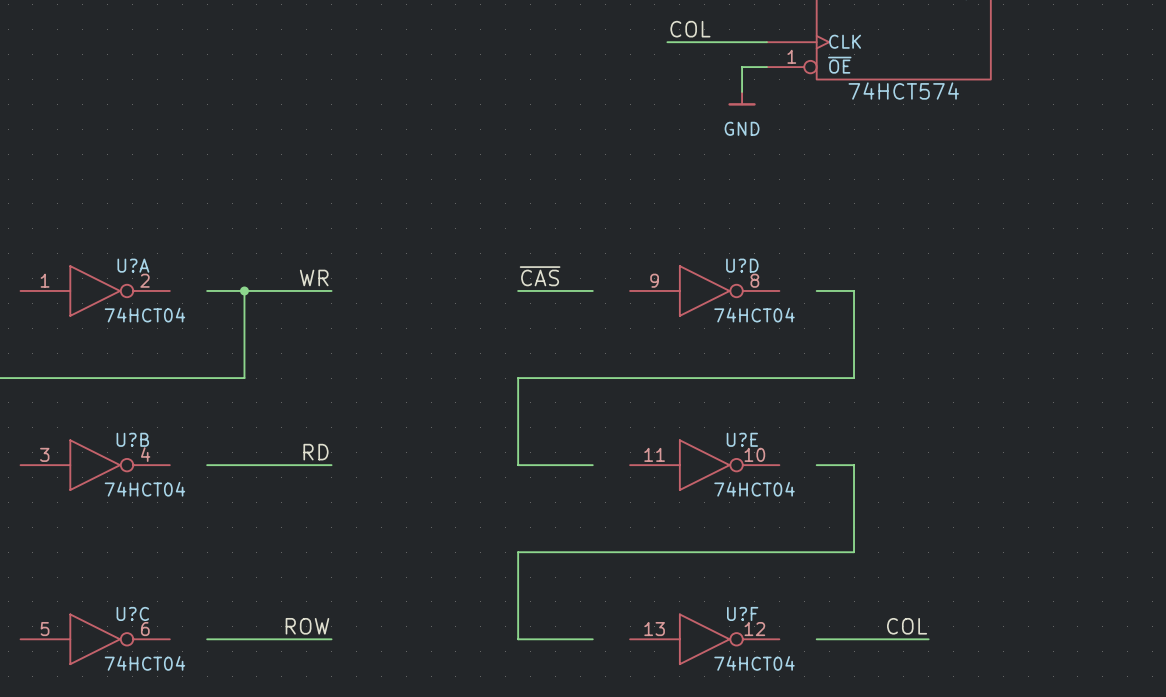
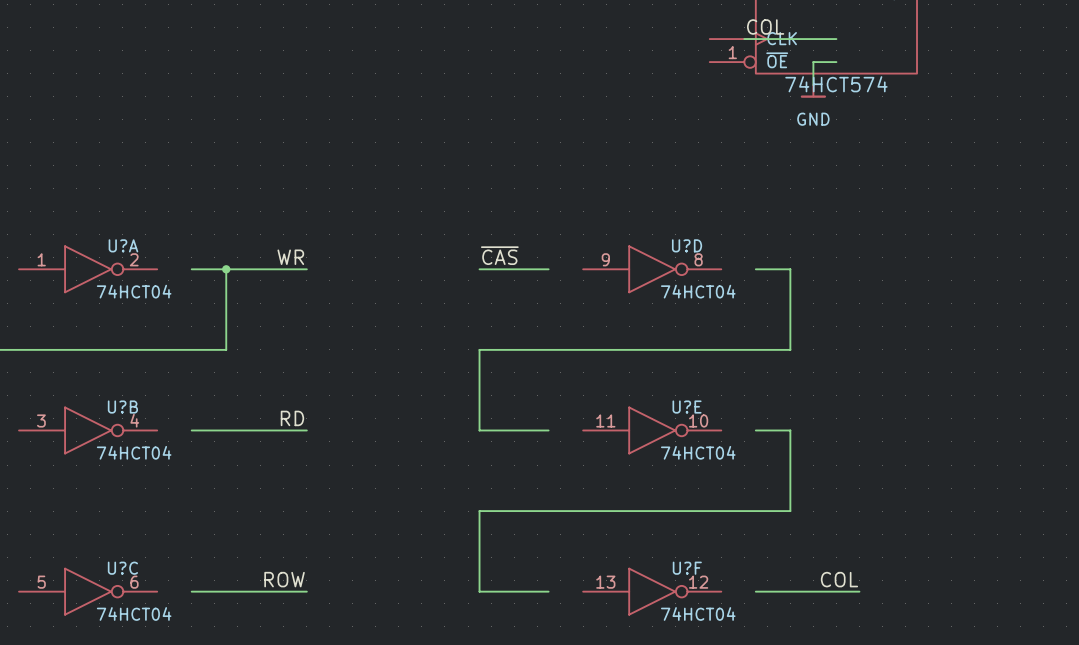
label position: COL (690, 29) -> COL (765, 27)
wire: (667, 42) (766, 42) -> (744, 39) (836, 39)
wire: (766, 67) (742, 67) (742, 91) -> (836, 62) (813, 62) (813, 85)
power symbol position: GND (742, 98) -> GND (813, 91)

